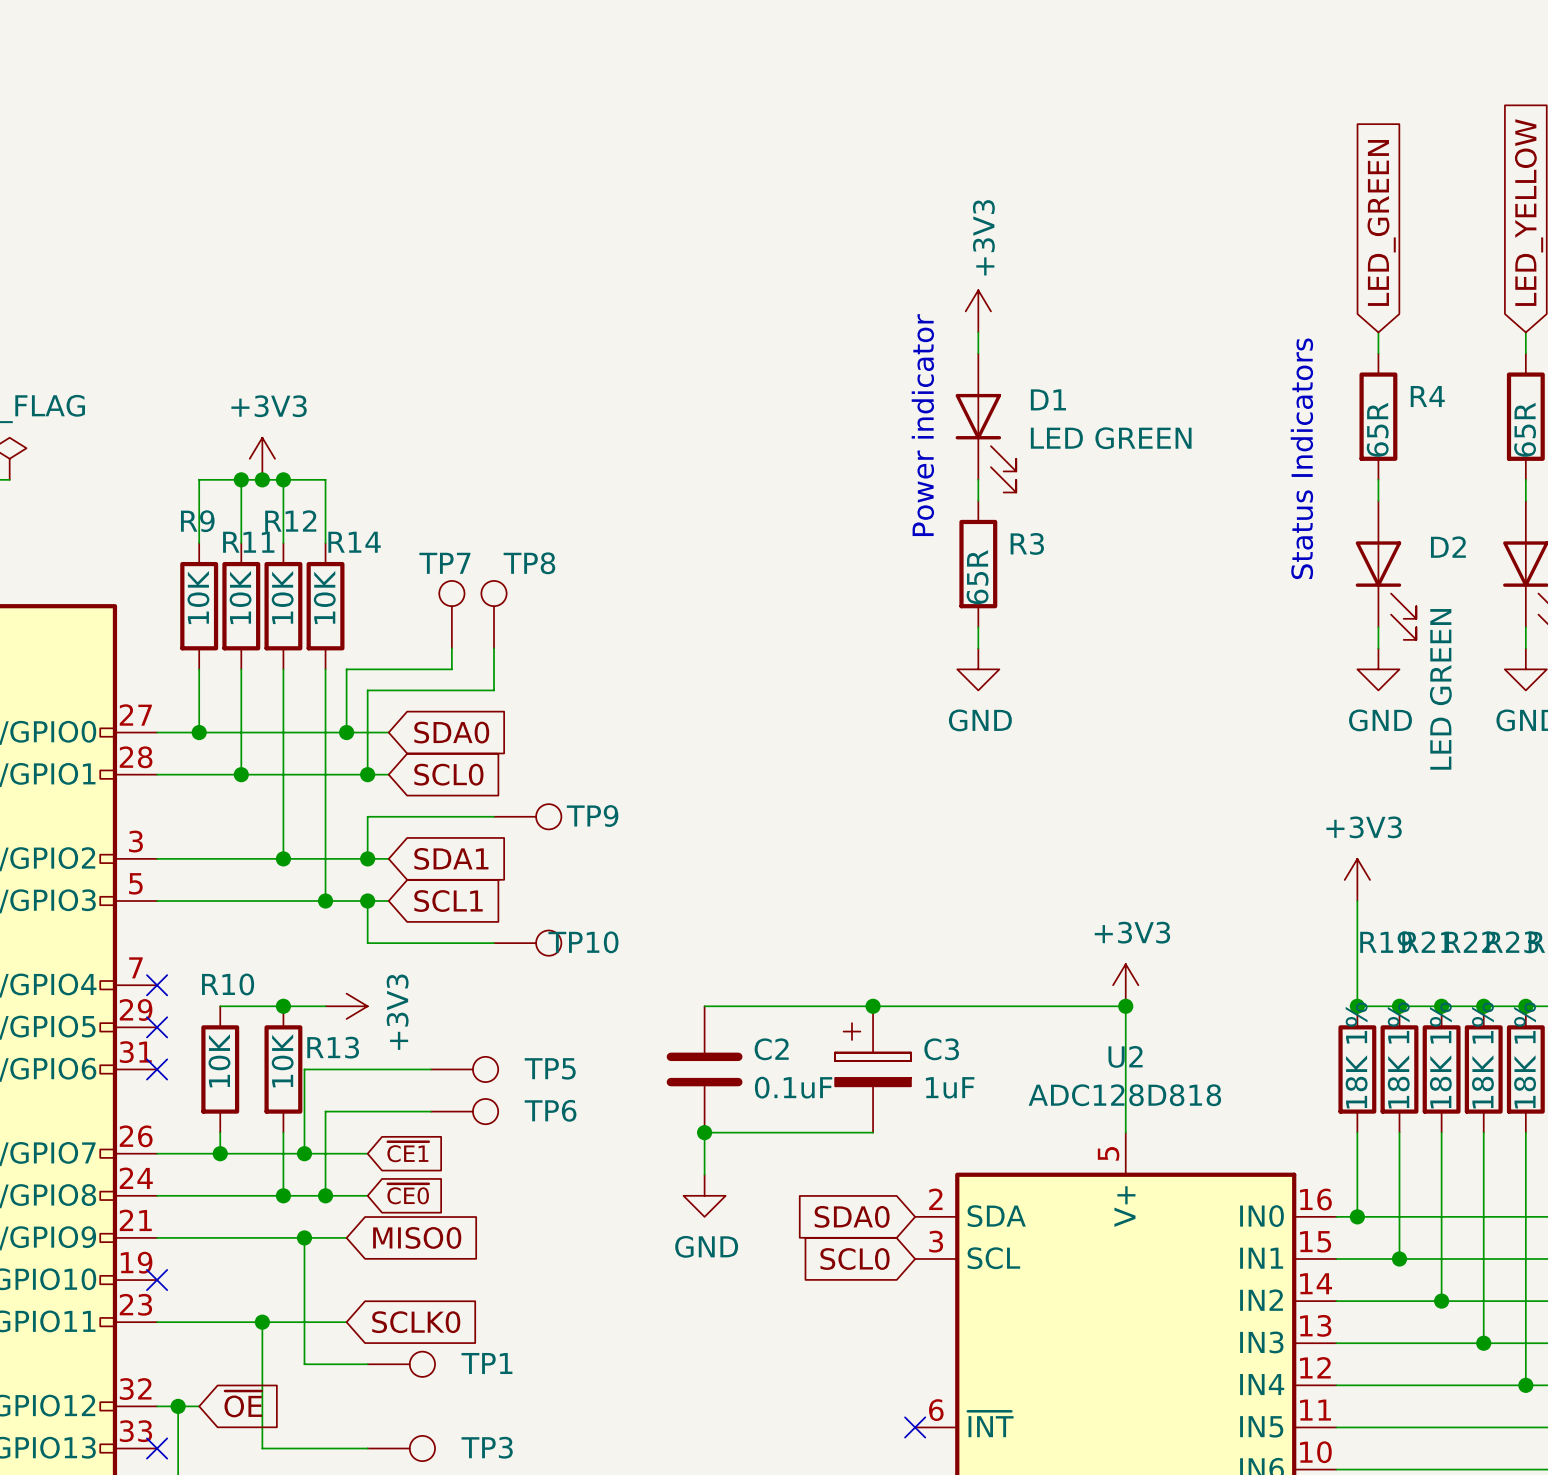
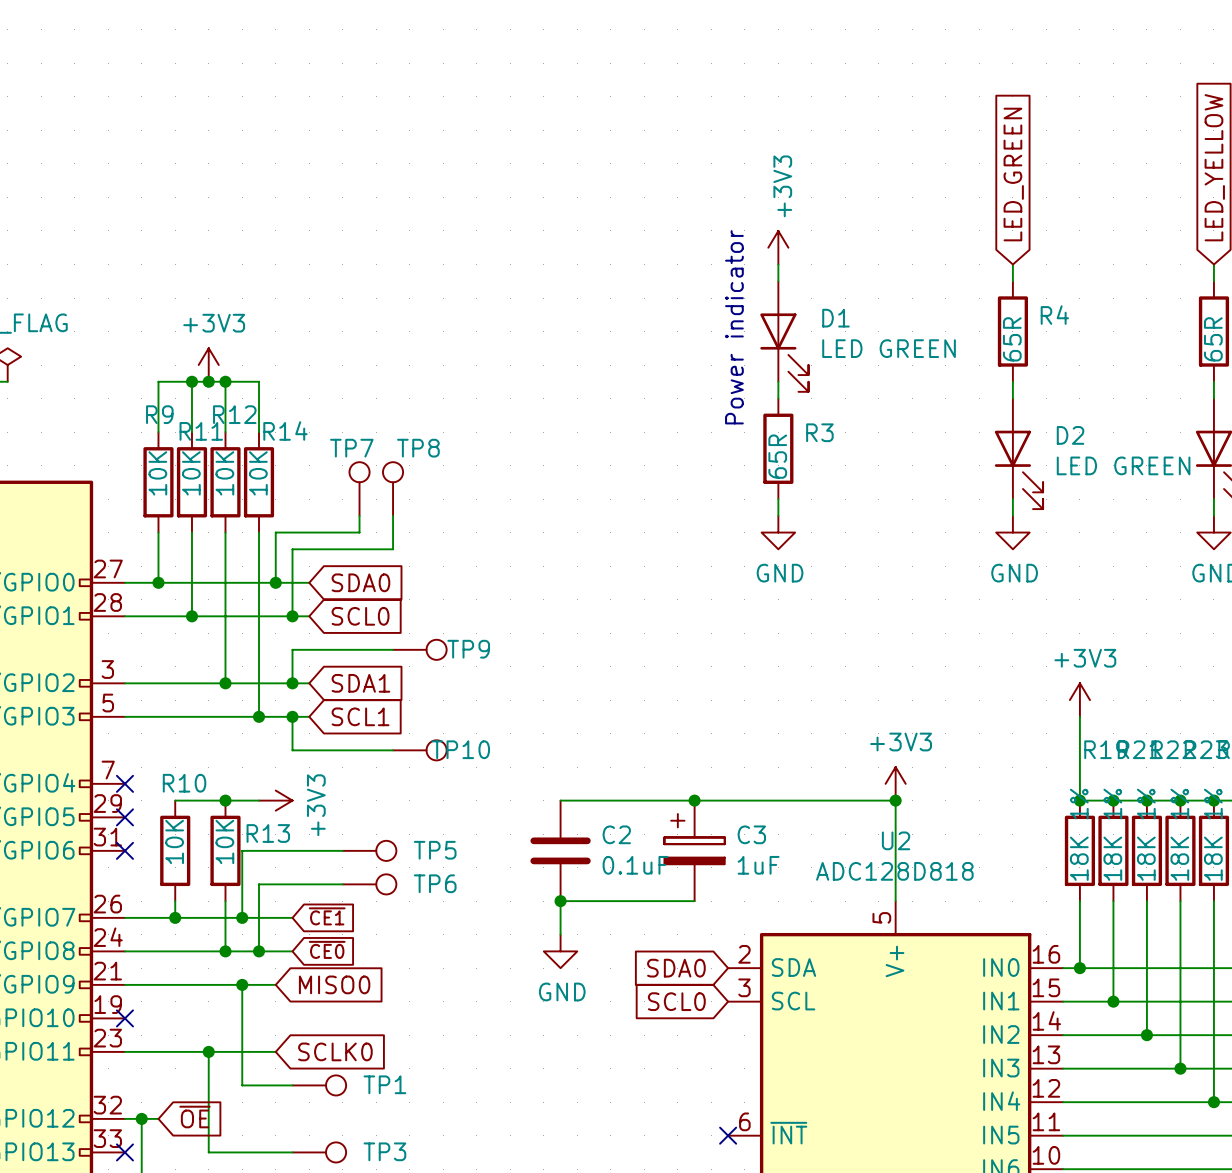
global label position: LED_GREEN (1381, 222) -> LED_GREEN (1013, 174)
wire: (1378, 332) (1378, 353) -> (1012, 264) (1012, 281)
R4 position: (1378, 416) -> (1012, 331)
text: Status Indicators (1301, 458) -> none
wire: (1378, 479) (1378, 500) -> (1012, 381) (1012, 398)
D2 position: (1386, 570) -> (1018, 453)
wire: (1378, 627) (1378, 648) -> (1012, 499) (1012, 515)
power symbol position: GND (1378, 669) -> GND (1012, 532)
D2 value rotation: 0° (1440, 689) -> 90° clockwise (1123, 465)

